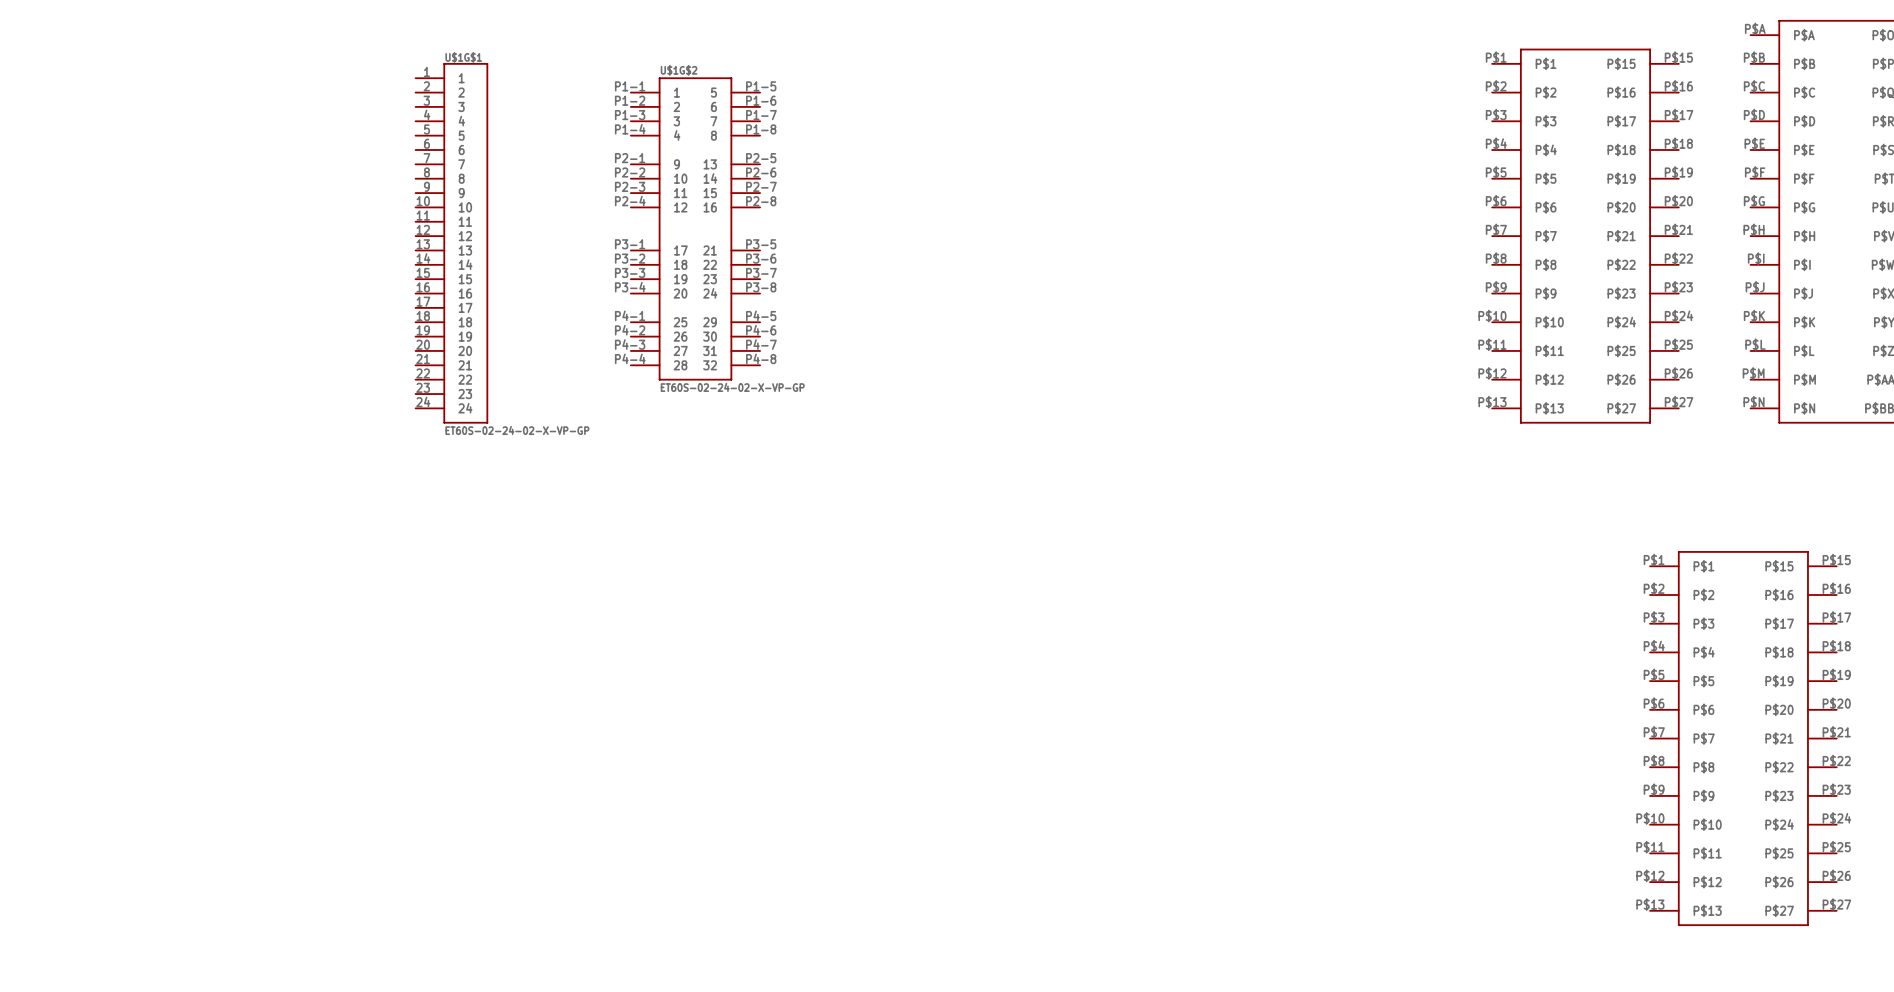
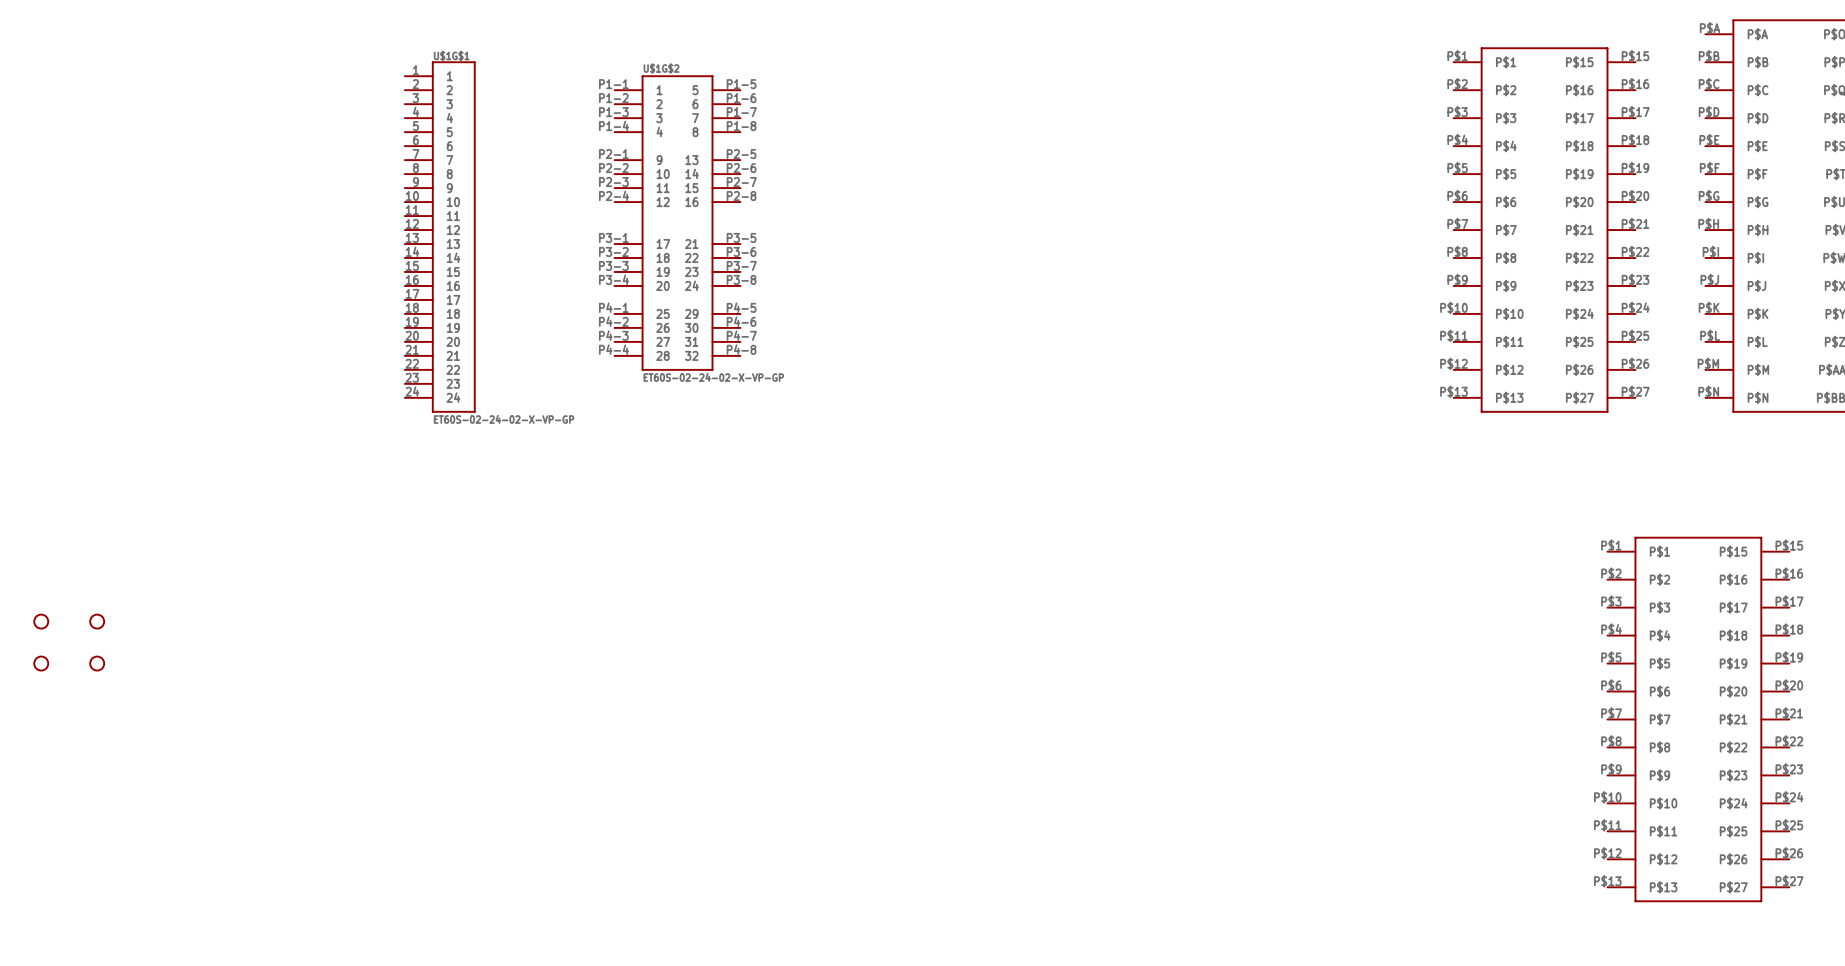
part: none -> (41, 621)
part: none -> (97, 621)
part: none -> (41, 663)
part: none -> (97, 663)

